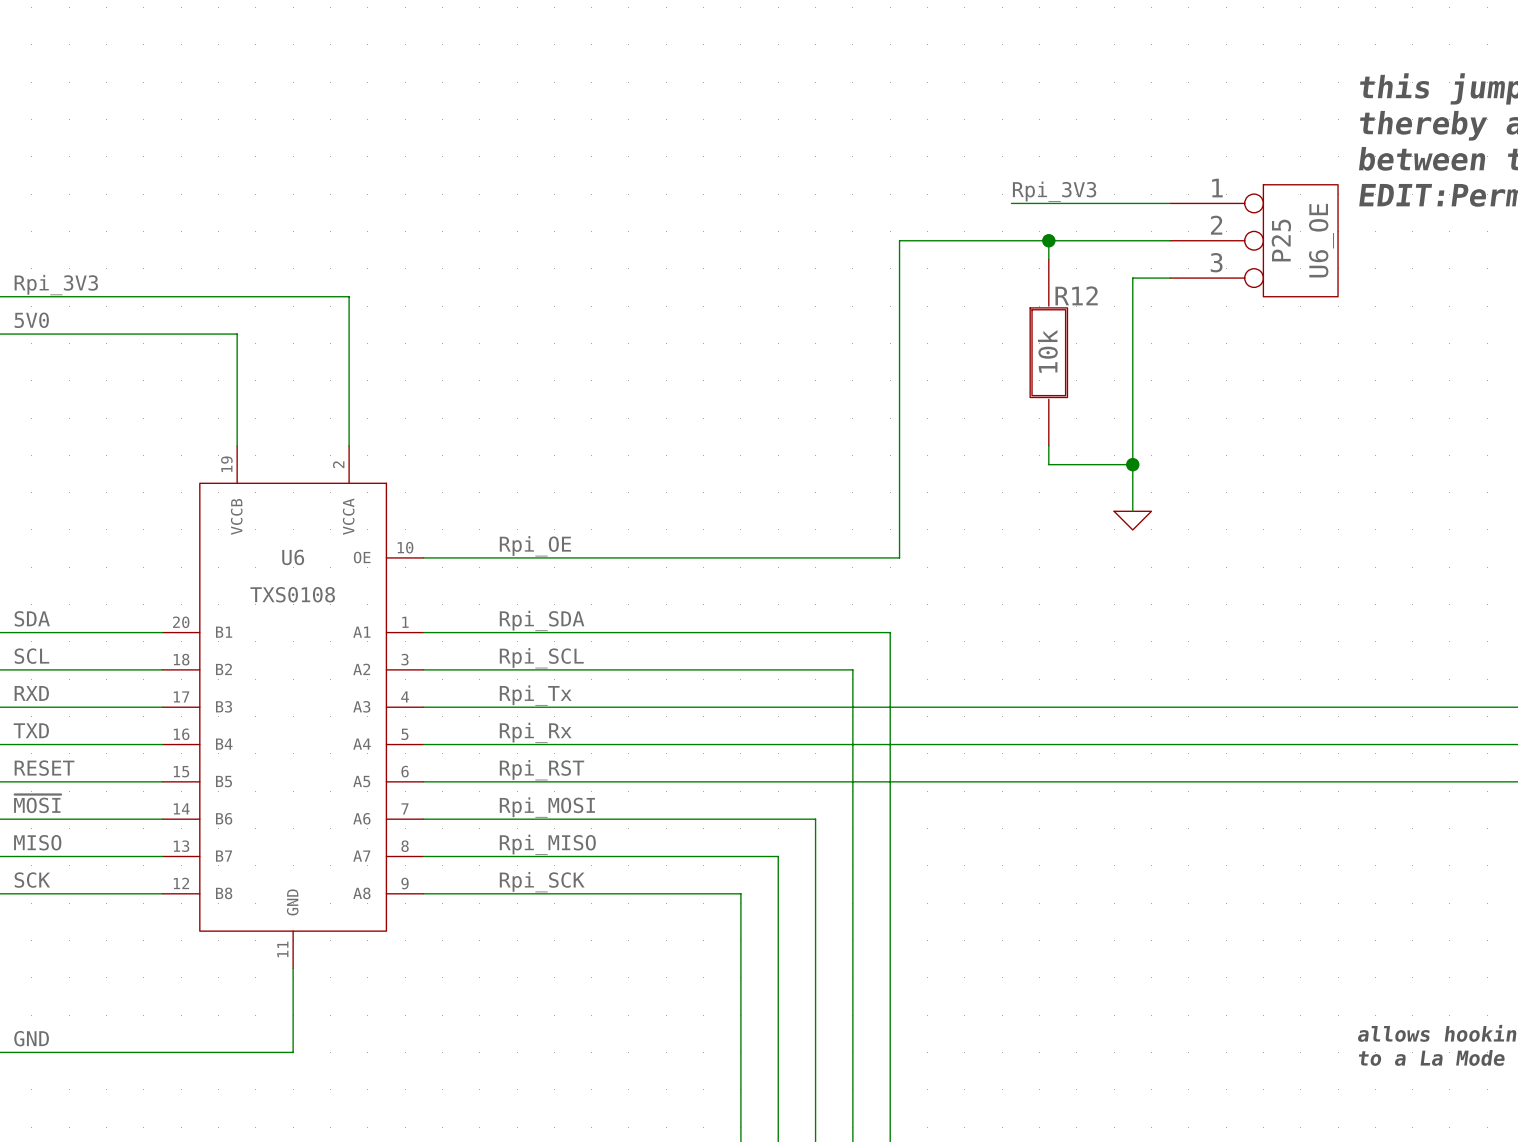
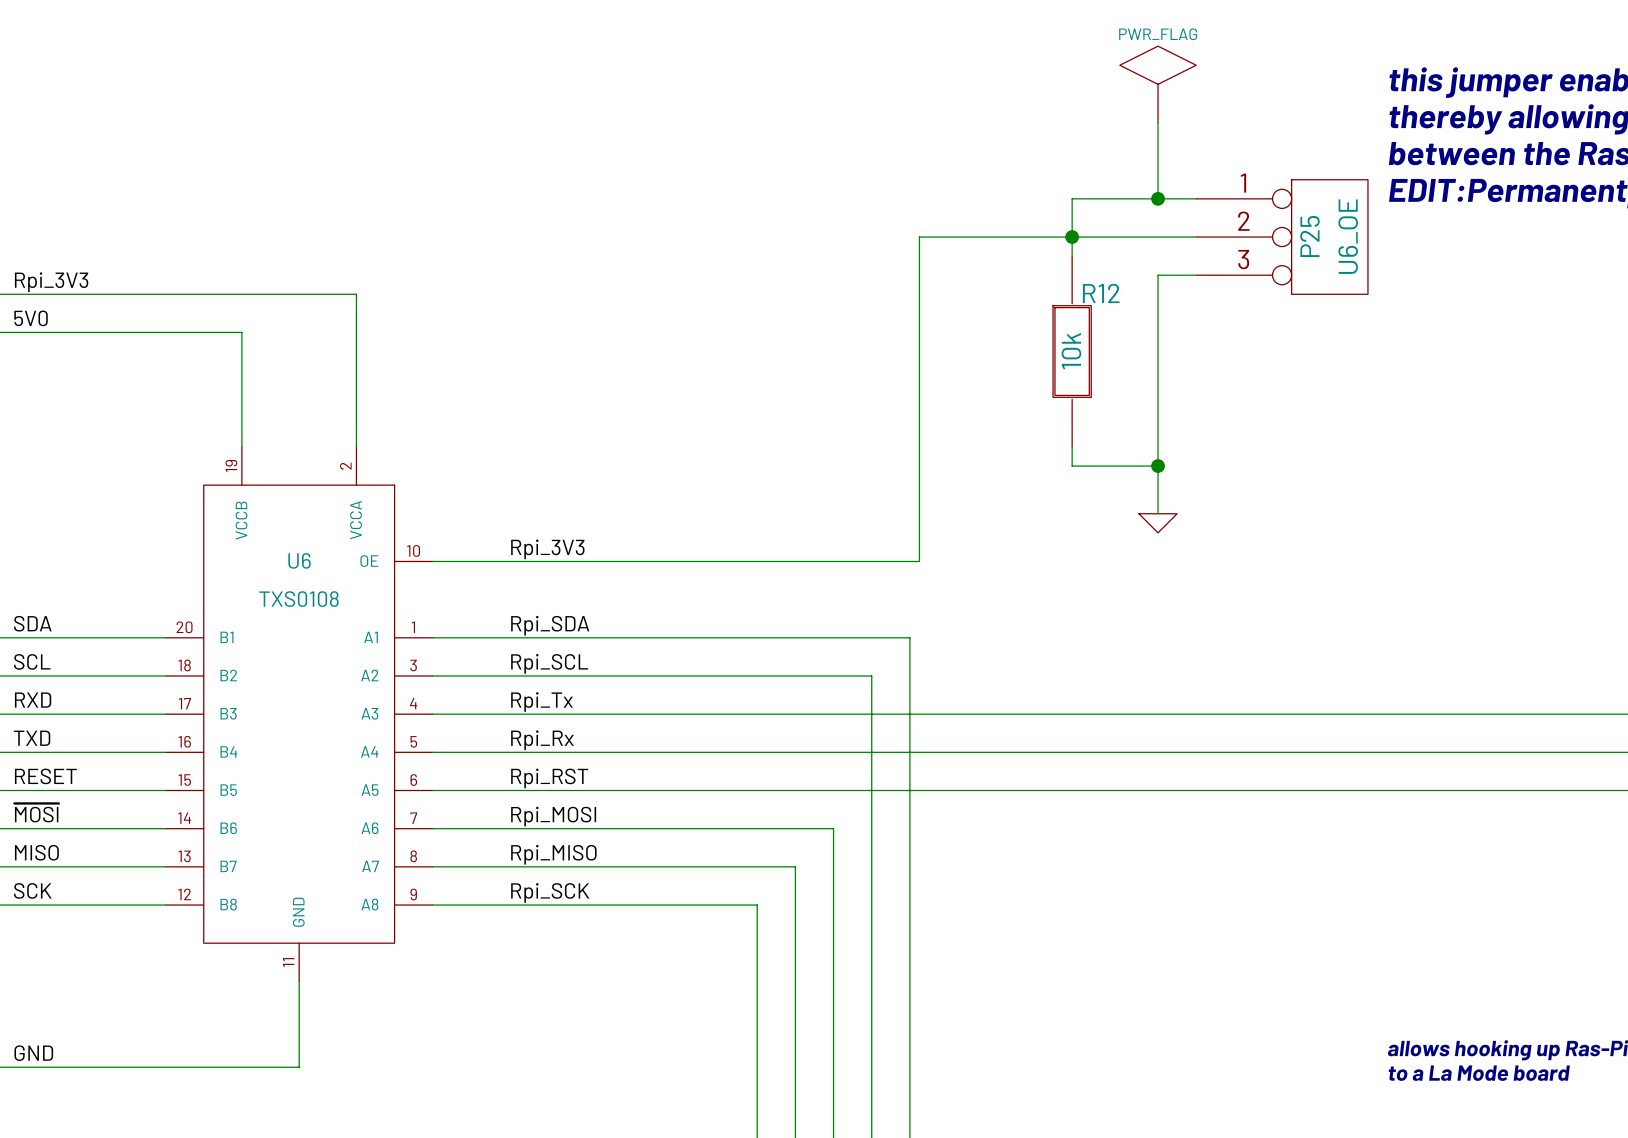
power symbol: none -> PWR_FLAG (1158, 84)
wire: none -> (1158, 122) (1158, 198)
label: Rpi_3V3 (1054, 191) -> none
wire: (1011, 203) (1048, 203) -> (1072, 237) (1072, 198)
junction: none -> (1158, 198)
label: Rpi_OE (535, 546) -> Rpi_3V3 (547, 549)

